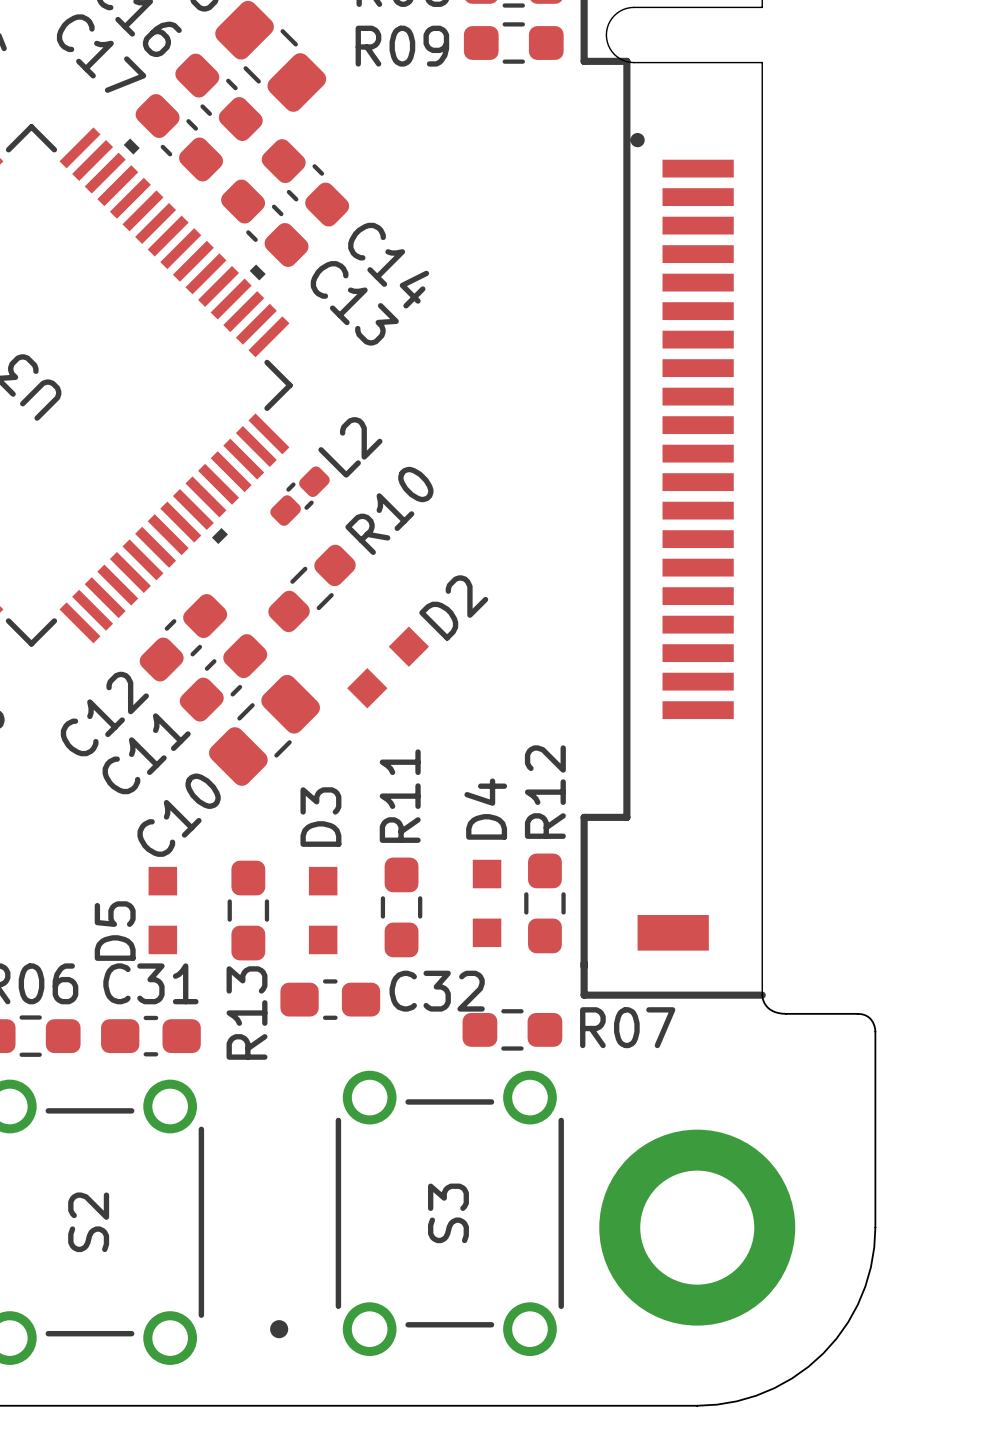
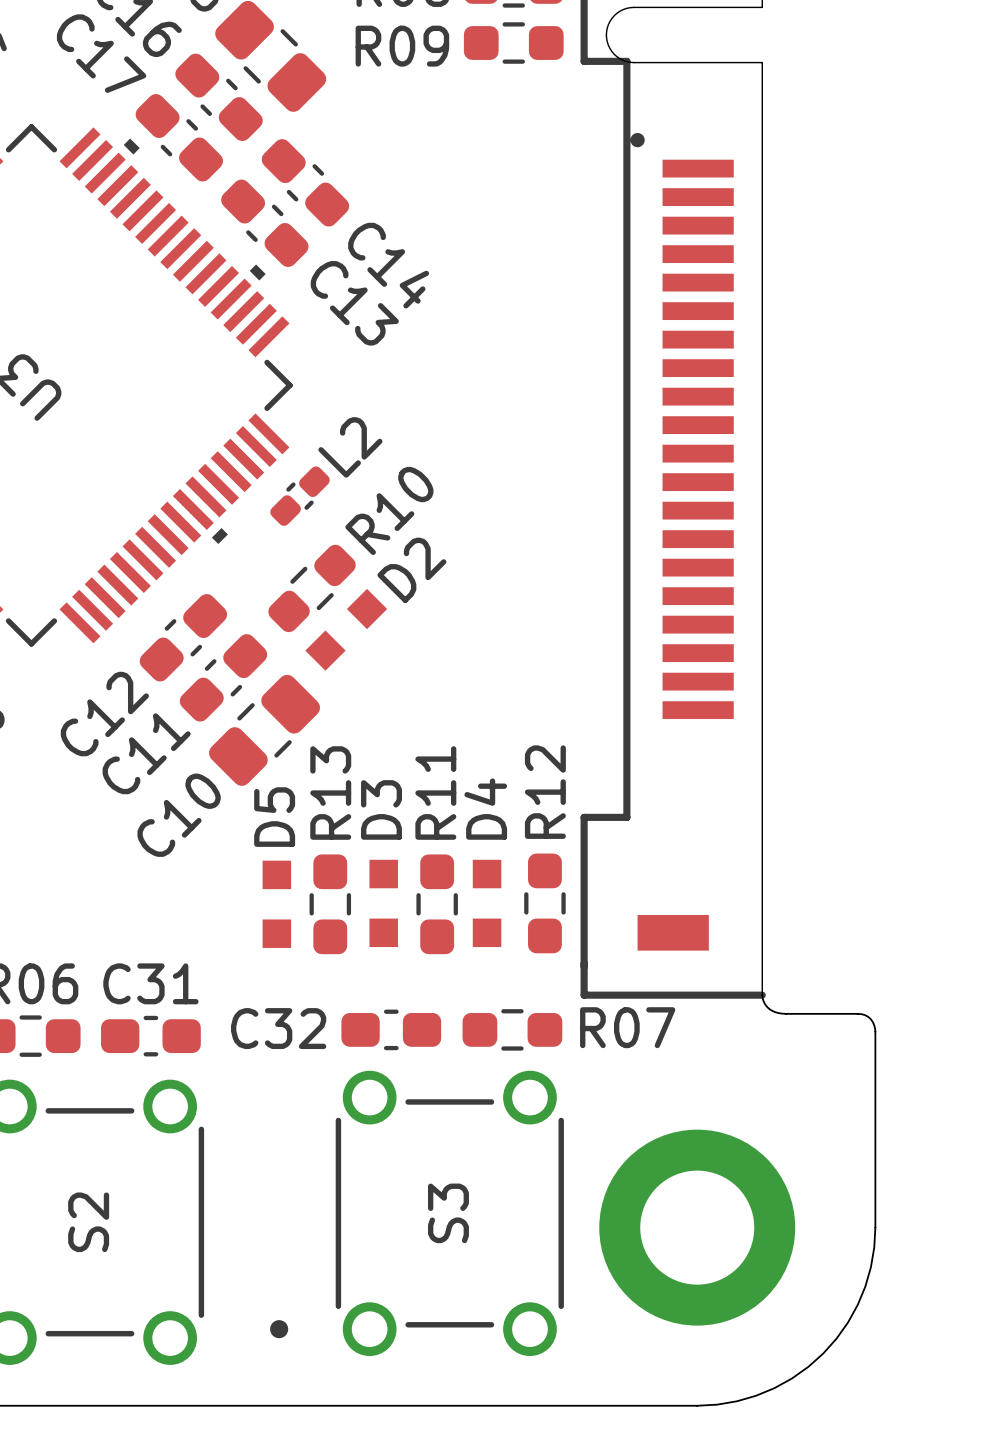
D2 position: (388, 667) -> (346, 629)
R11 position: (401, 907) -> (437, 904)
D5 position: (162, 910) -> (276, 904)
R13 position: (248, 910) -> (330, 904)
D3 position: (323, 910) -> (383, 903)
D5 name position: D5 (115, 931) -> D5 (274, 817)
C32 name position: C32 (437, 991) -> C32 (278, 1028)
C32 position: (330, 999) -> (391, 1029)
R13 name position: R13 (247, 1013) -> R13 (330, 793)

